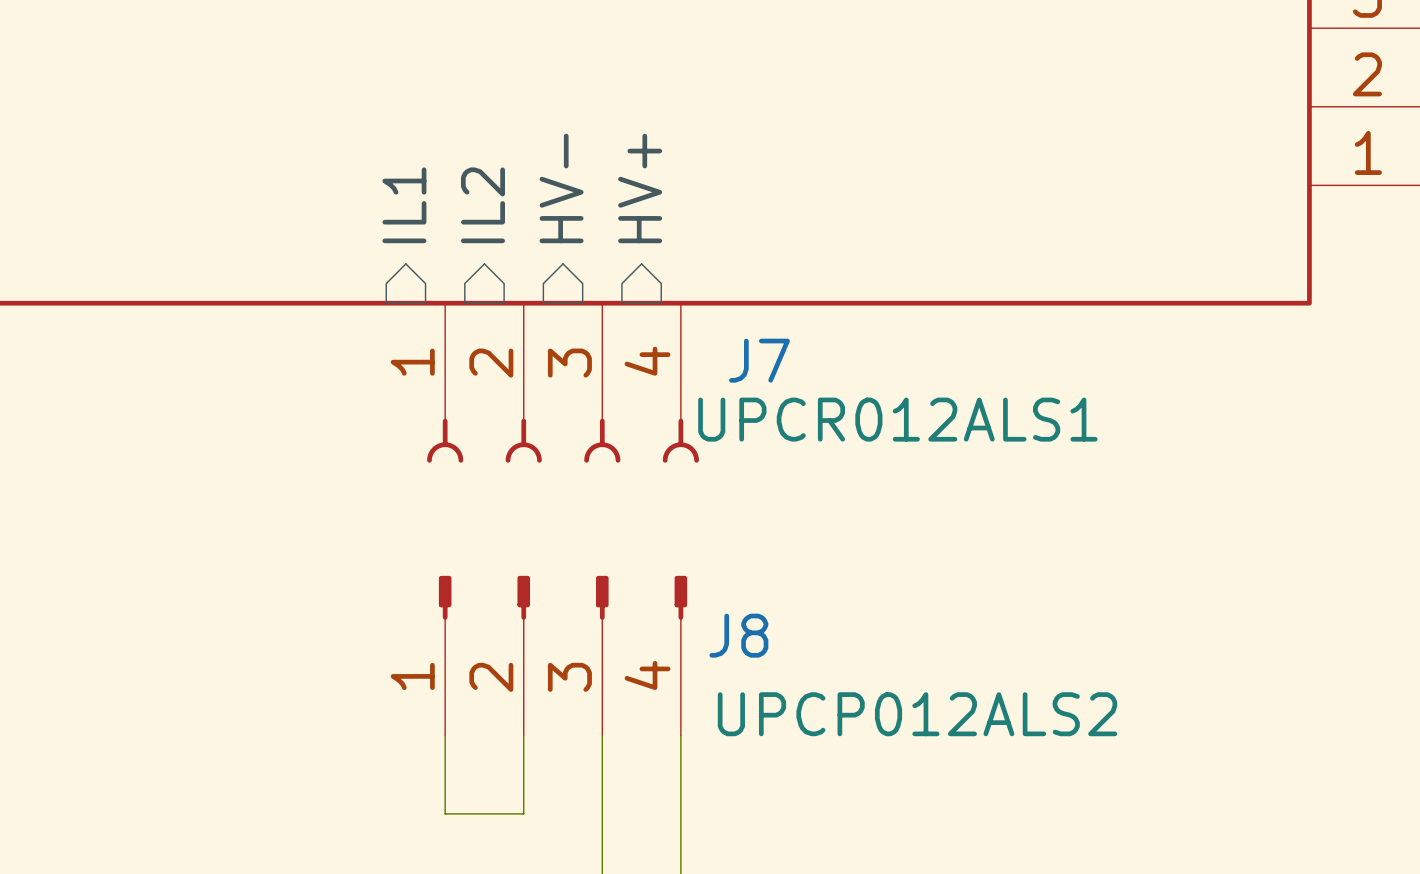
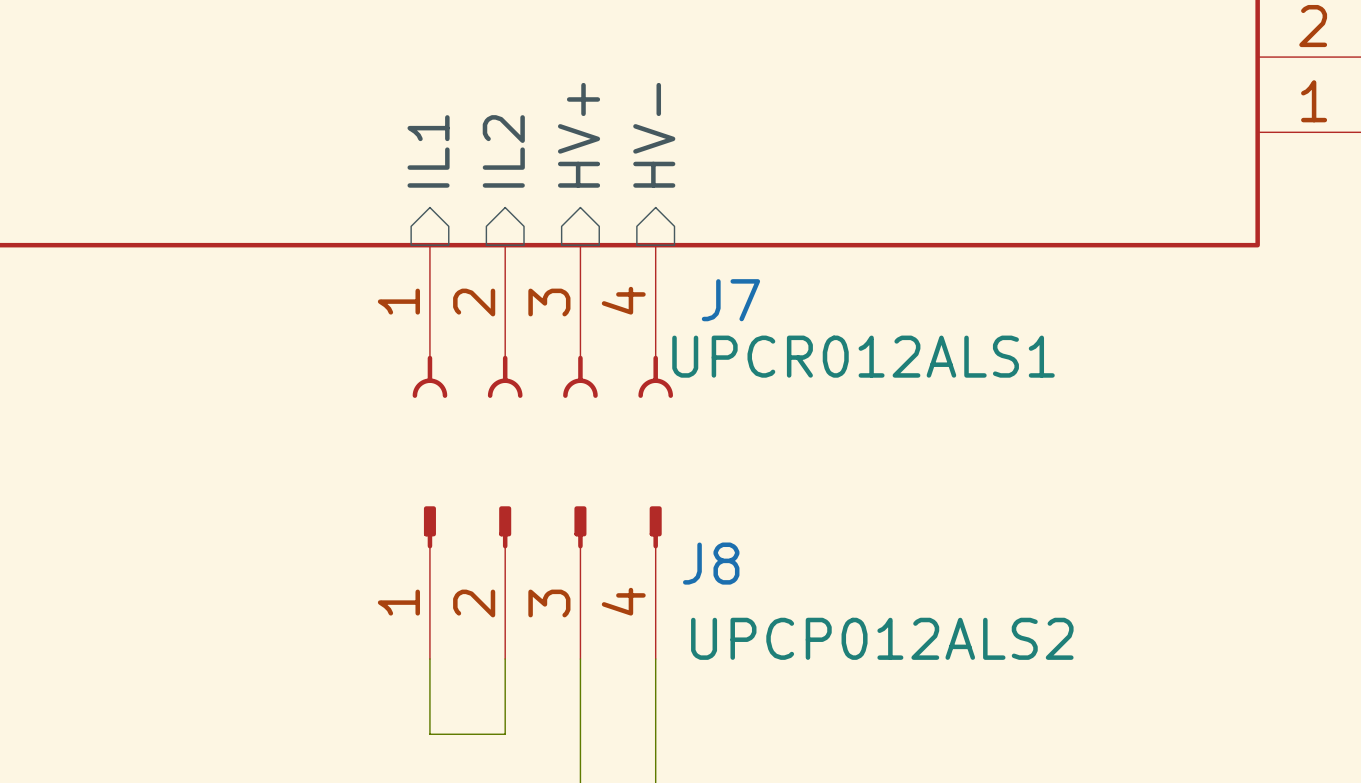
sheet pin position: HV- (561, 188) -> HV- (654, 135)
sheet pin position: HV+ (640, 188) -> HV+ (579, 135)
sheet pin position: IL1 (404, 205) -> IL1 (428, 151)
sheet pin position: IL2 (482, 205) -> IL2 (503, 151)

